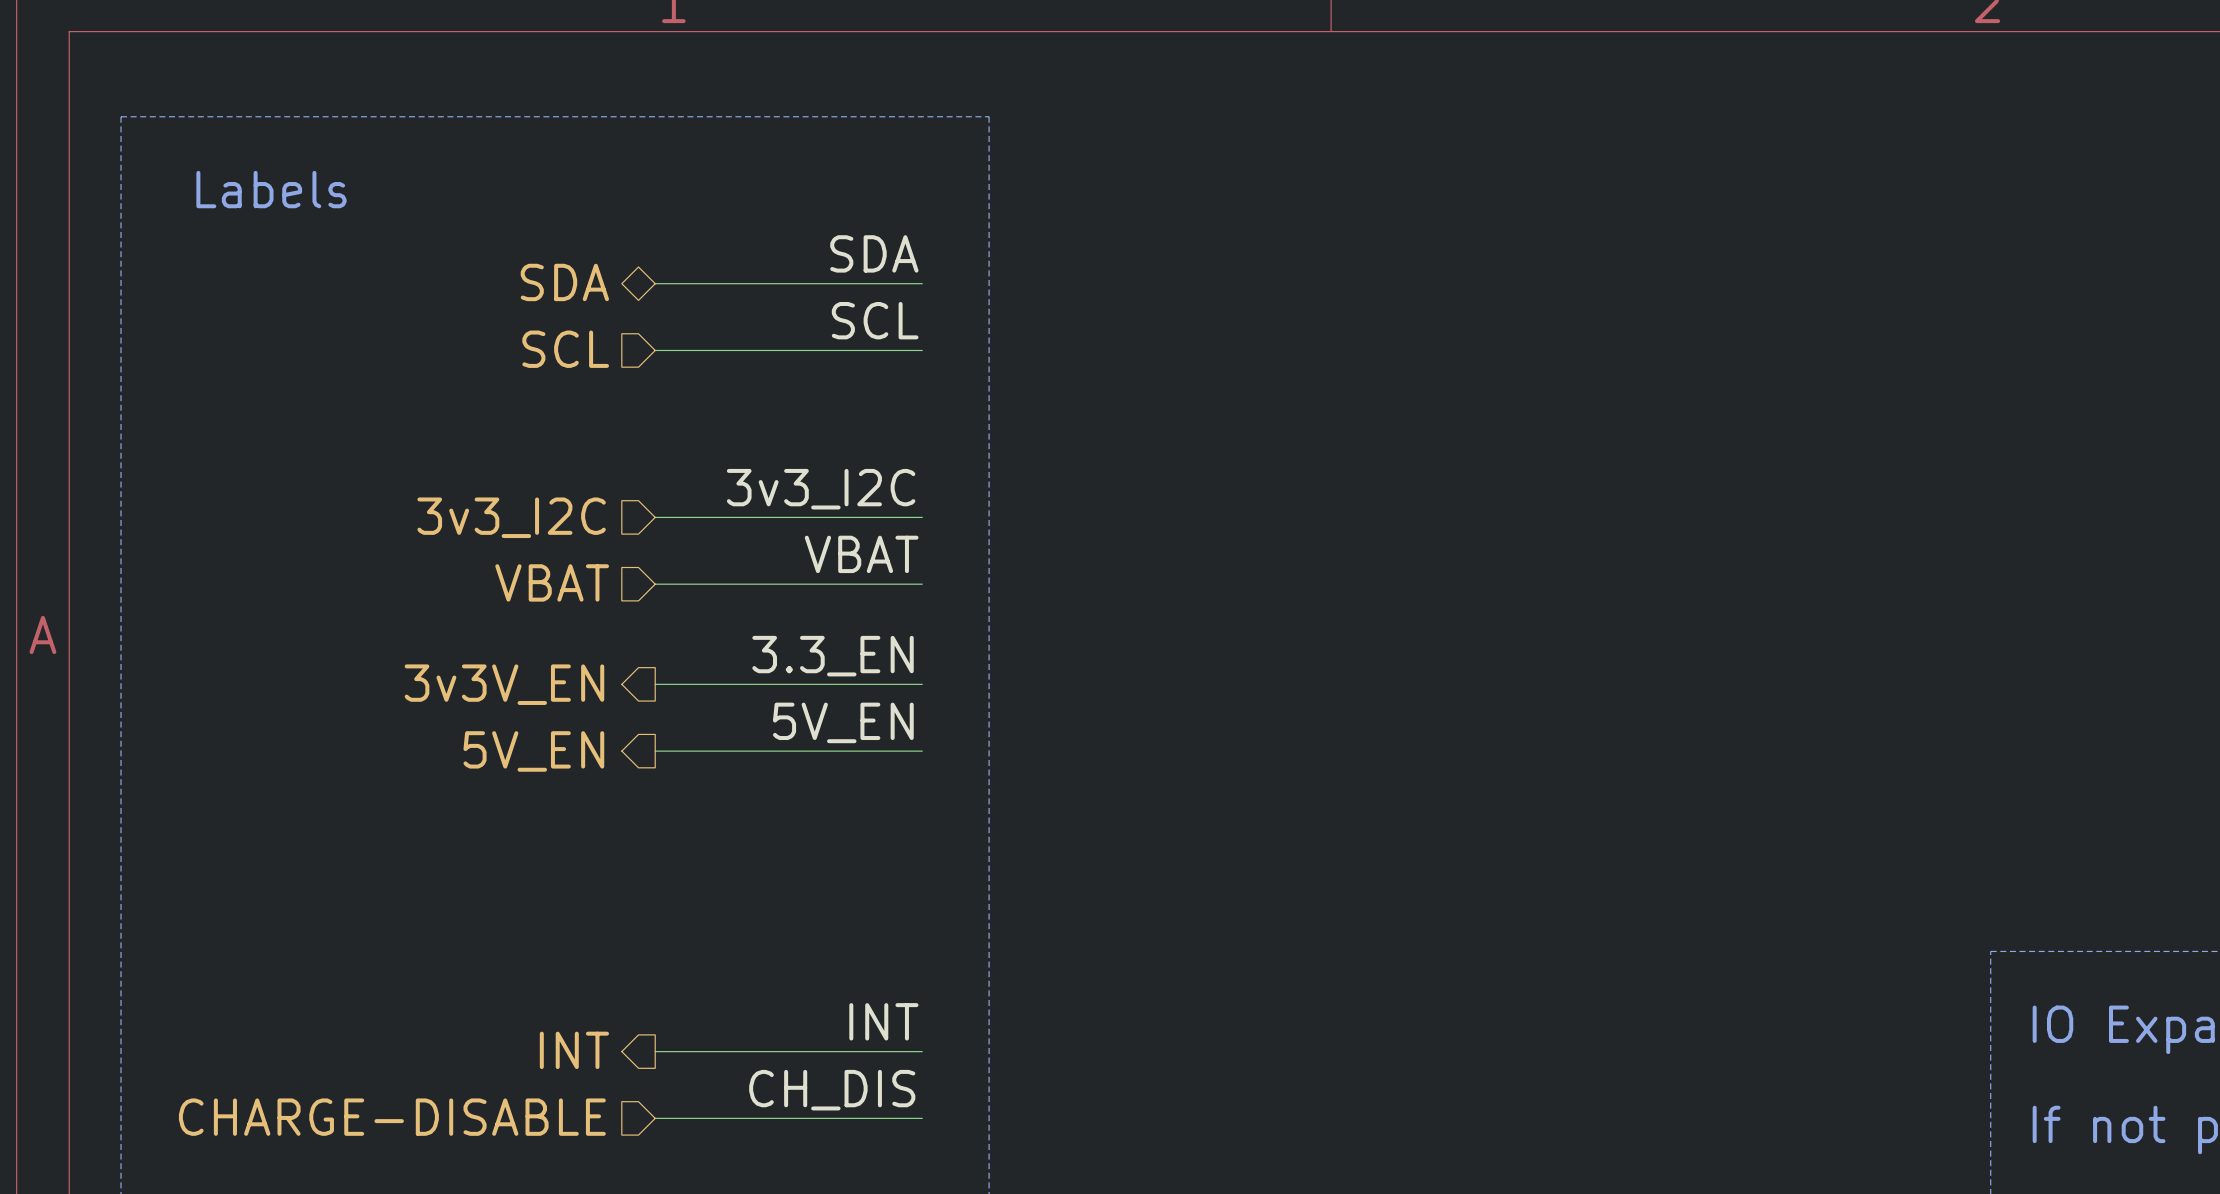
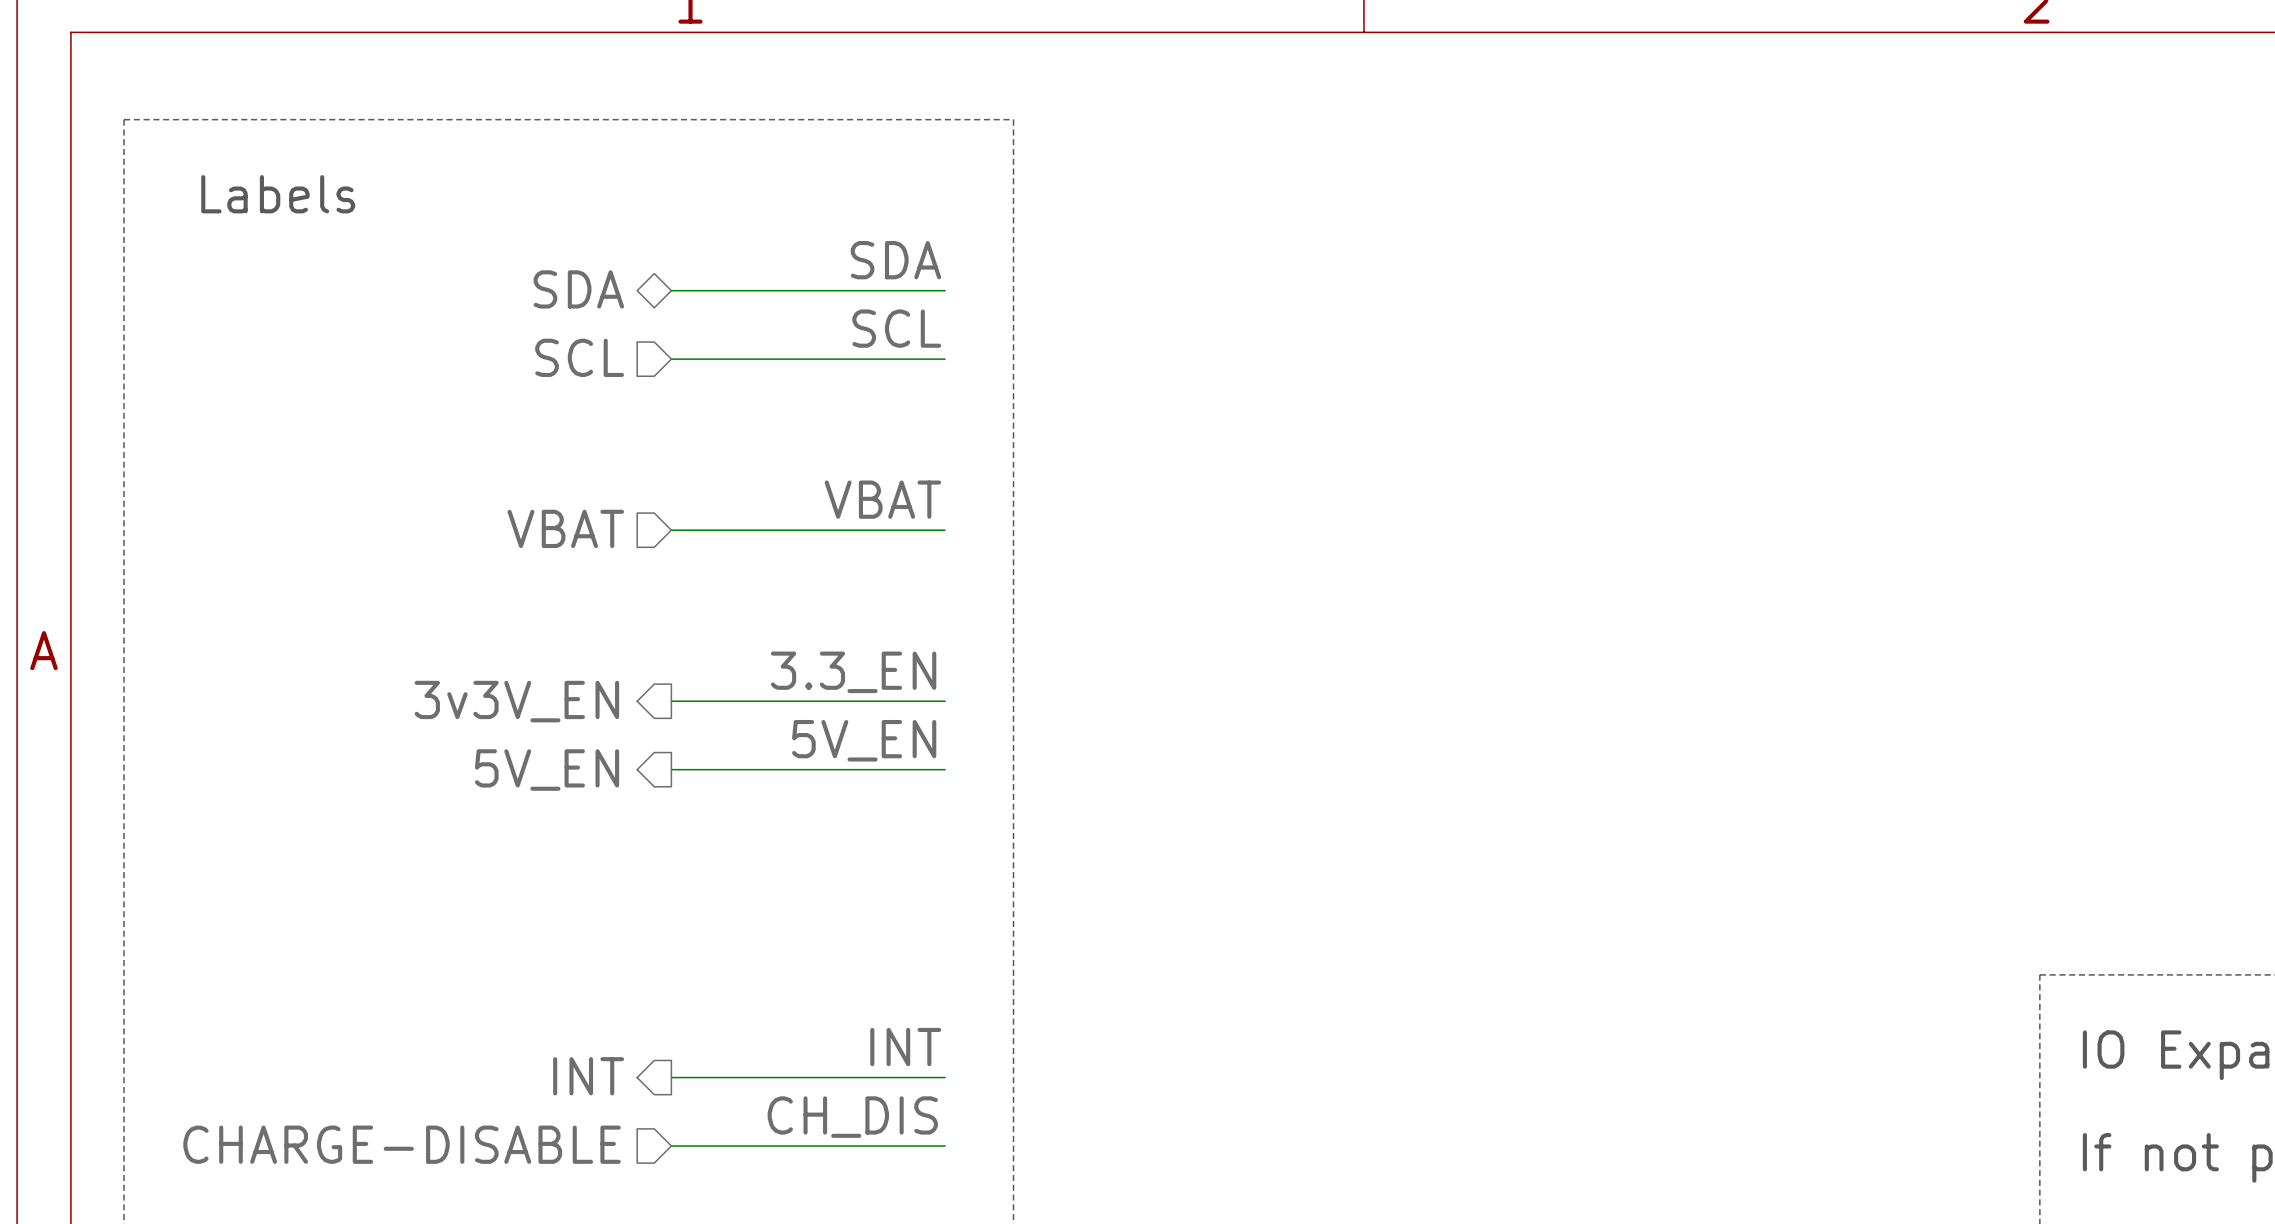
label: 3v3_I2C (821, 489) -> VBAT (882, 499)
hierarchical label: 3v3_I2C (511, 517) -> VBAT (565, 528)
label: VBAT (861, 554) -> none
hierarchical label: VBAT (552, 582) -> none
wire: (655, 584) (922, 584) -> none

